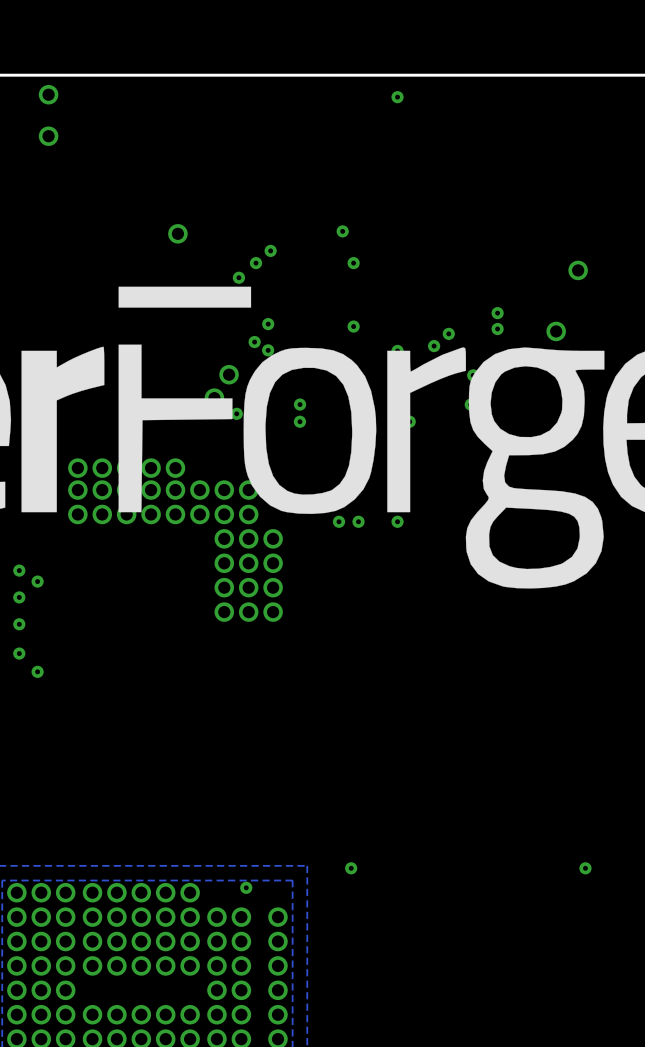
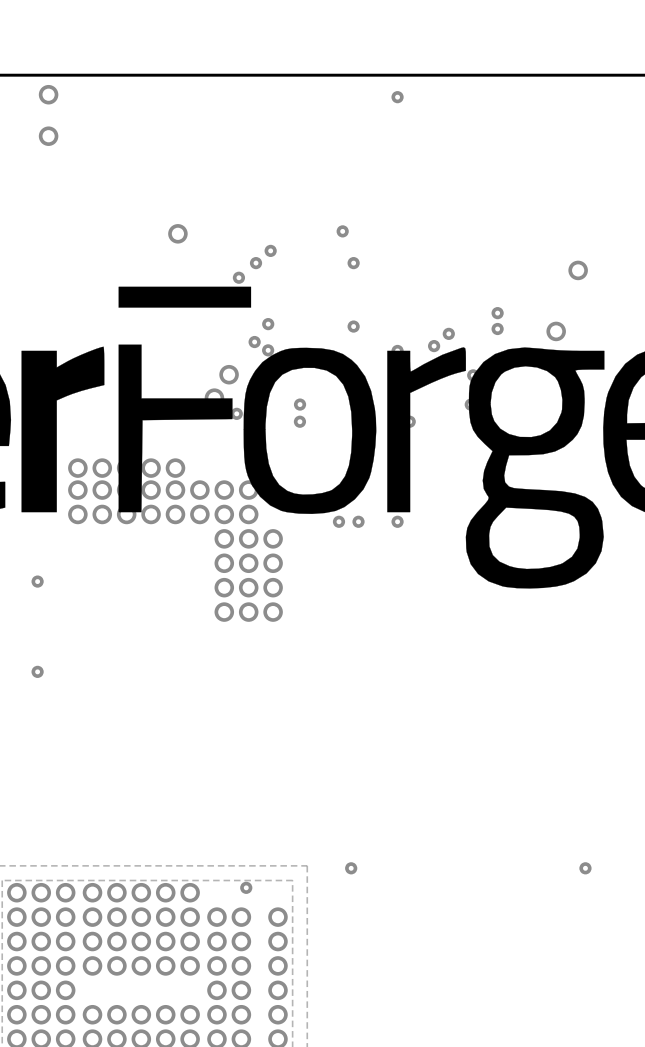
via: (19, 570) -> none
via: (19, 597) -> none
via: (19, 624) -> none
via: (19, 653) -> none

